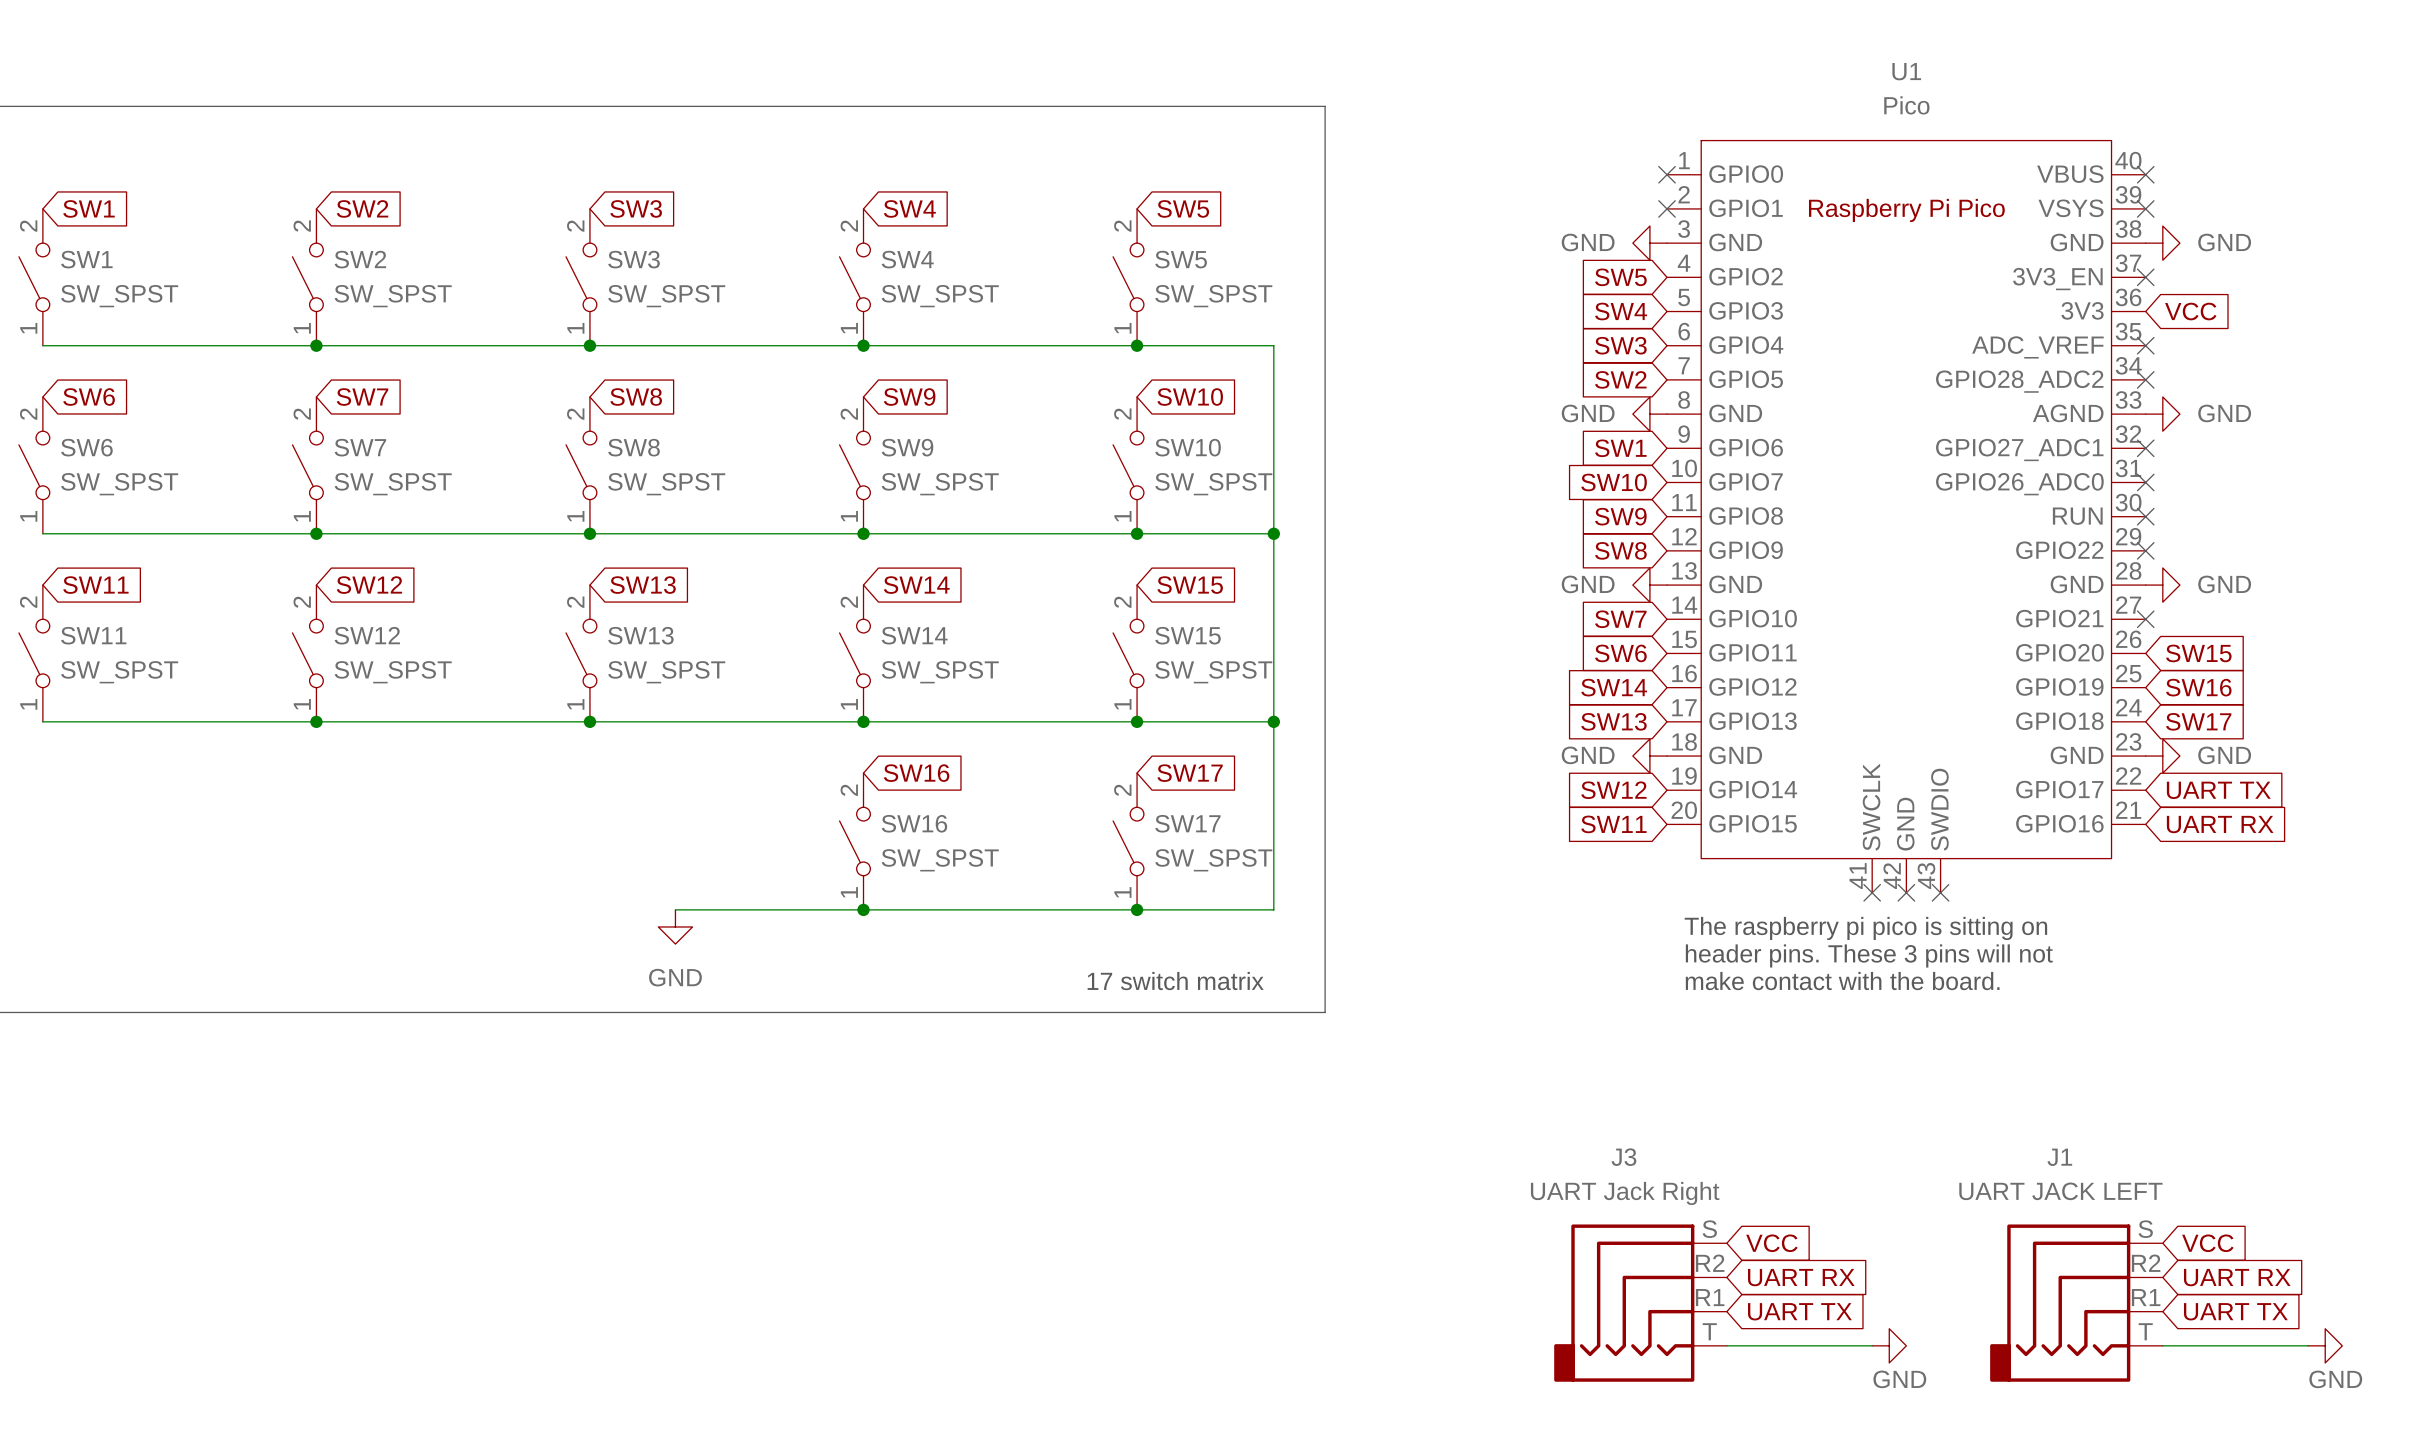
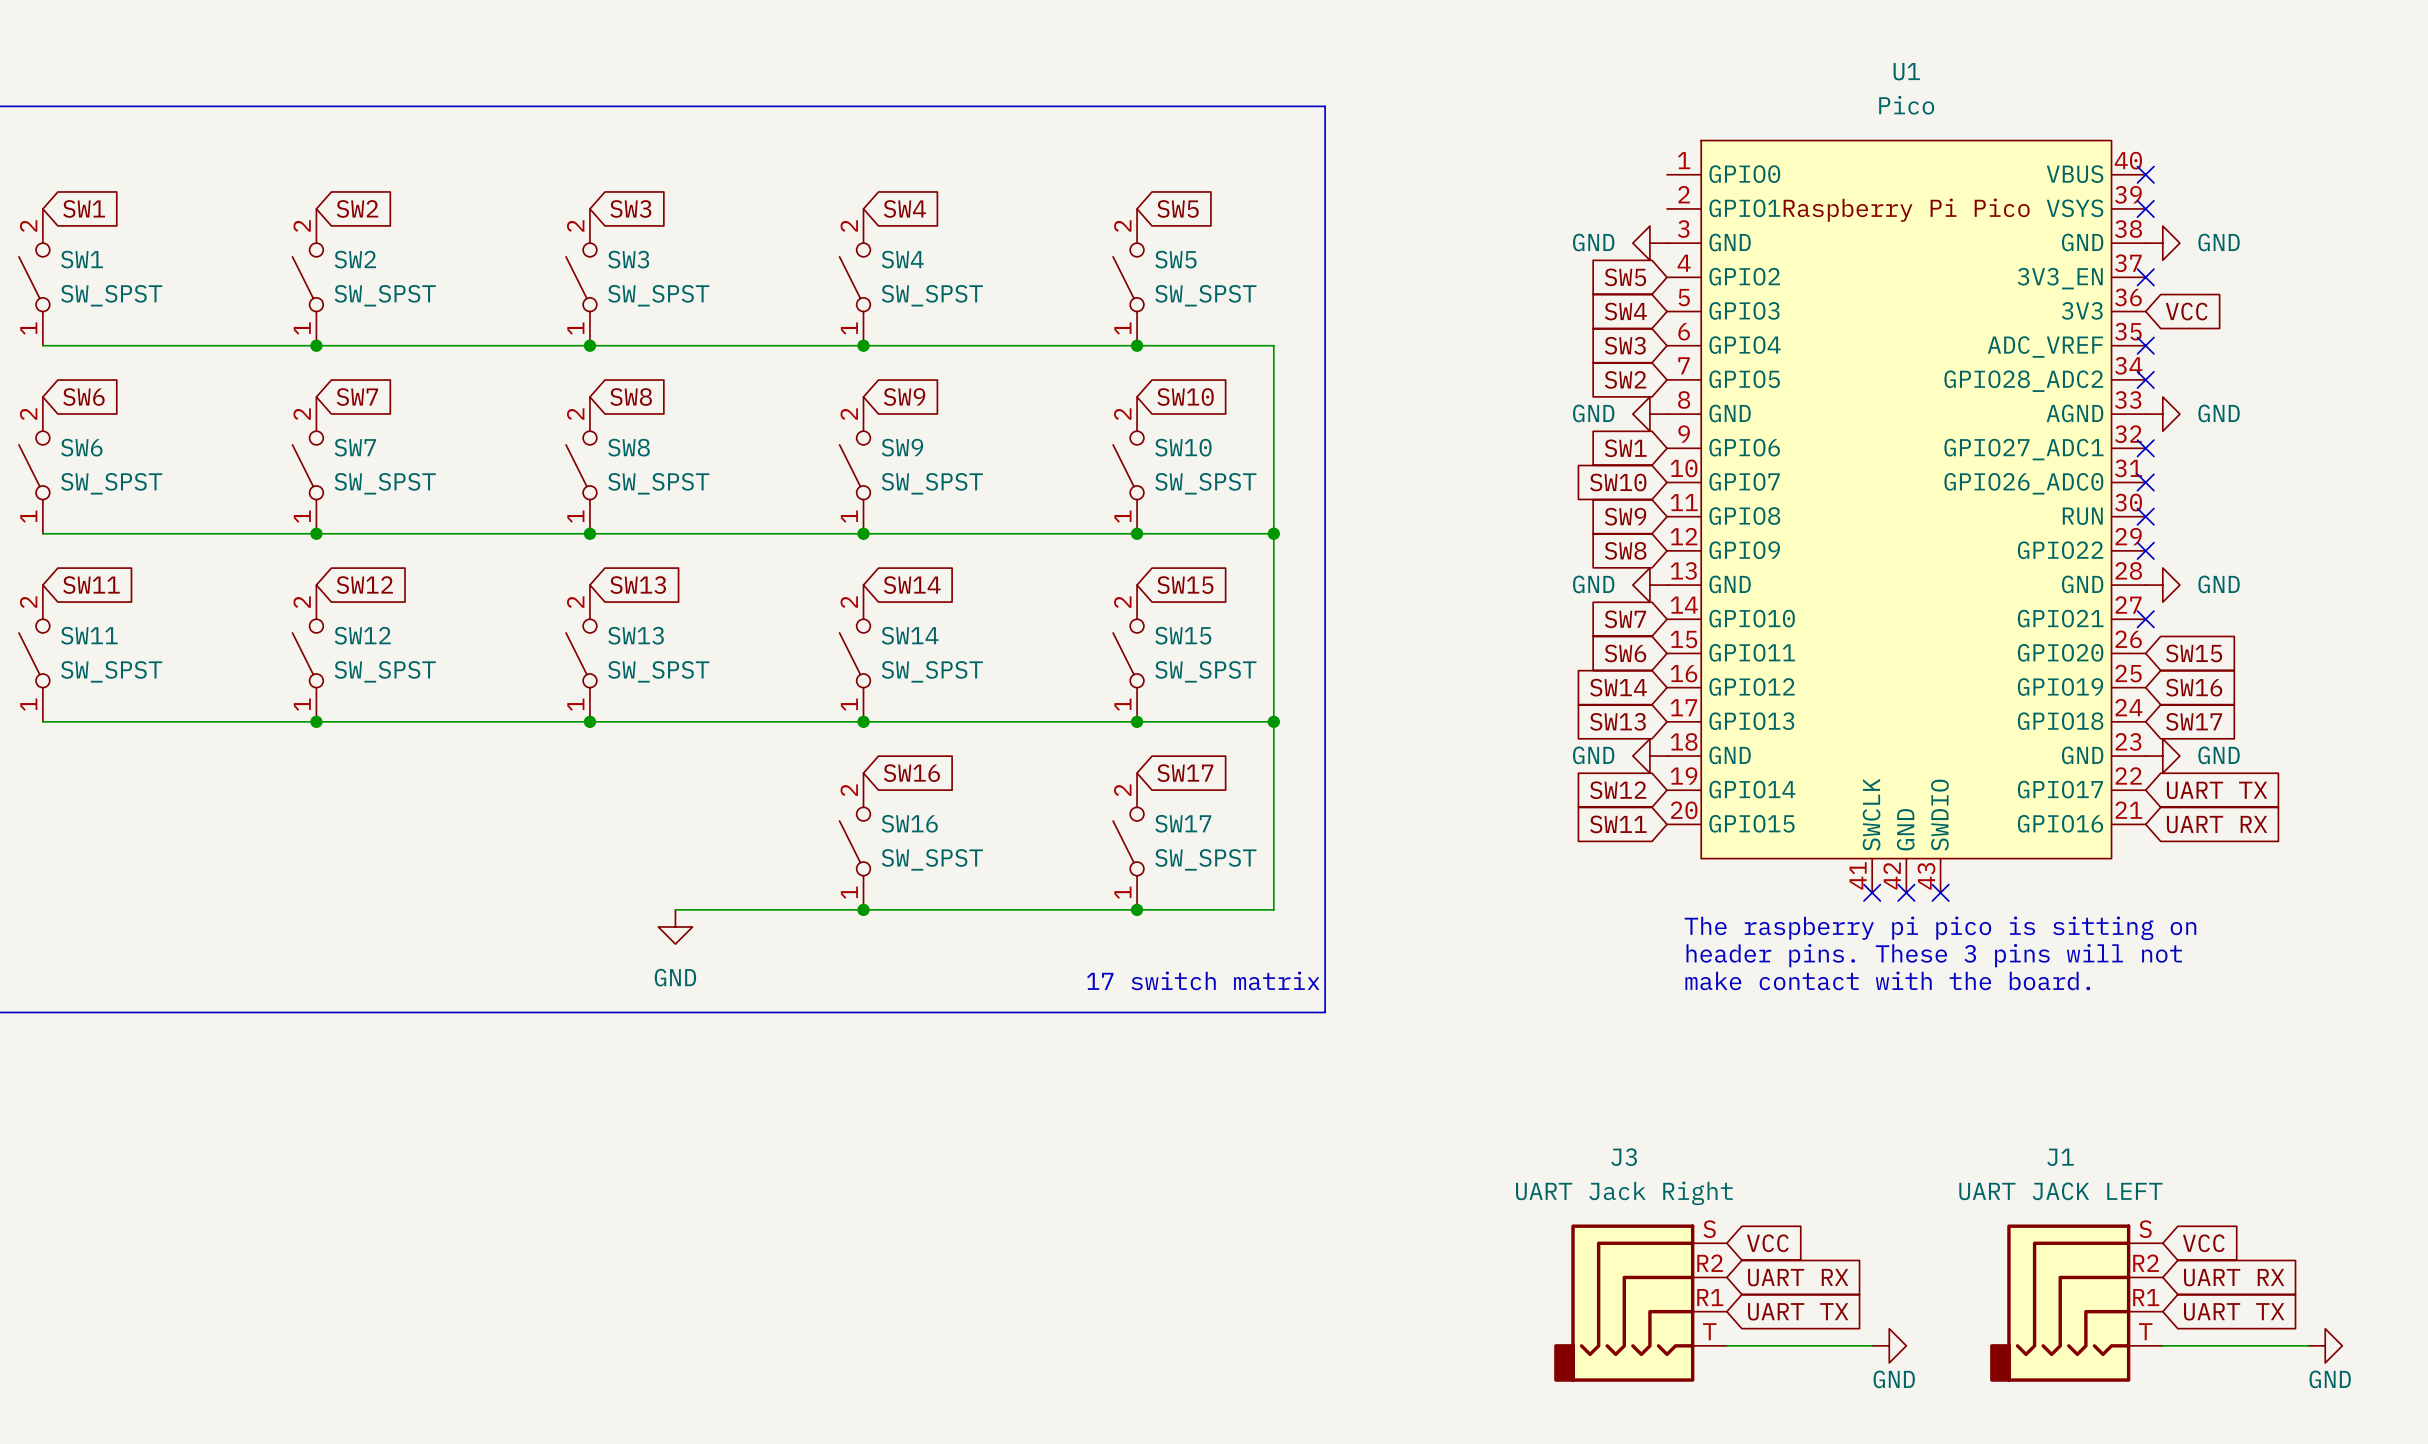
no-connect mark: (1667, 174) -> none
no-connect mark: (1667, 208) -> none

